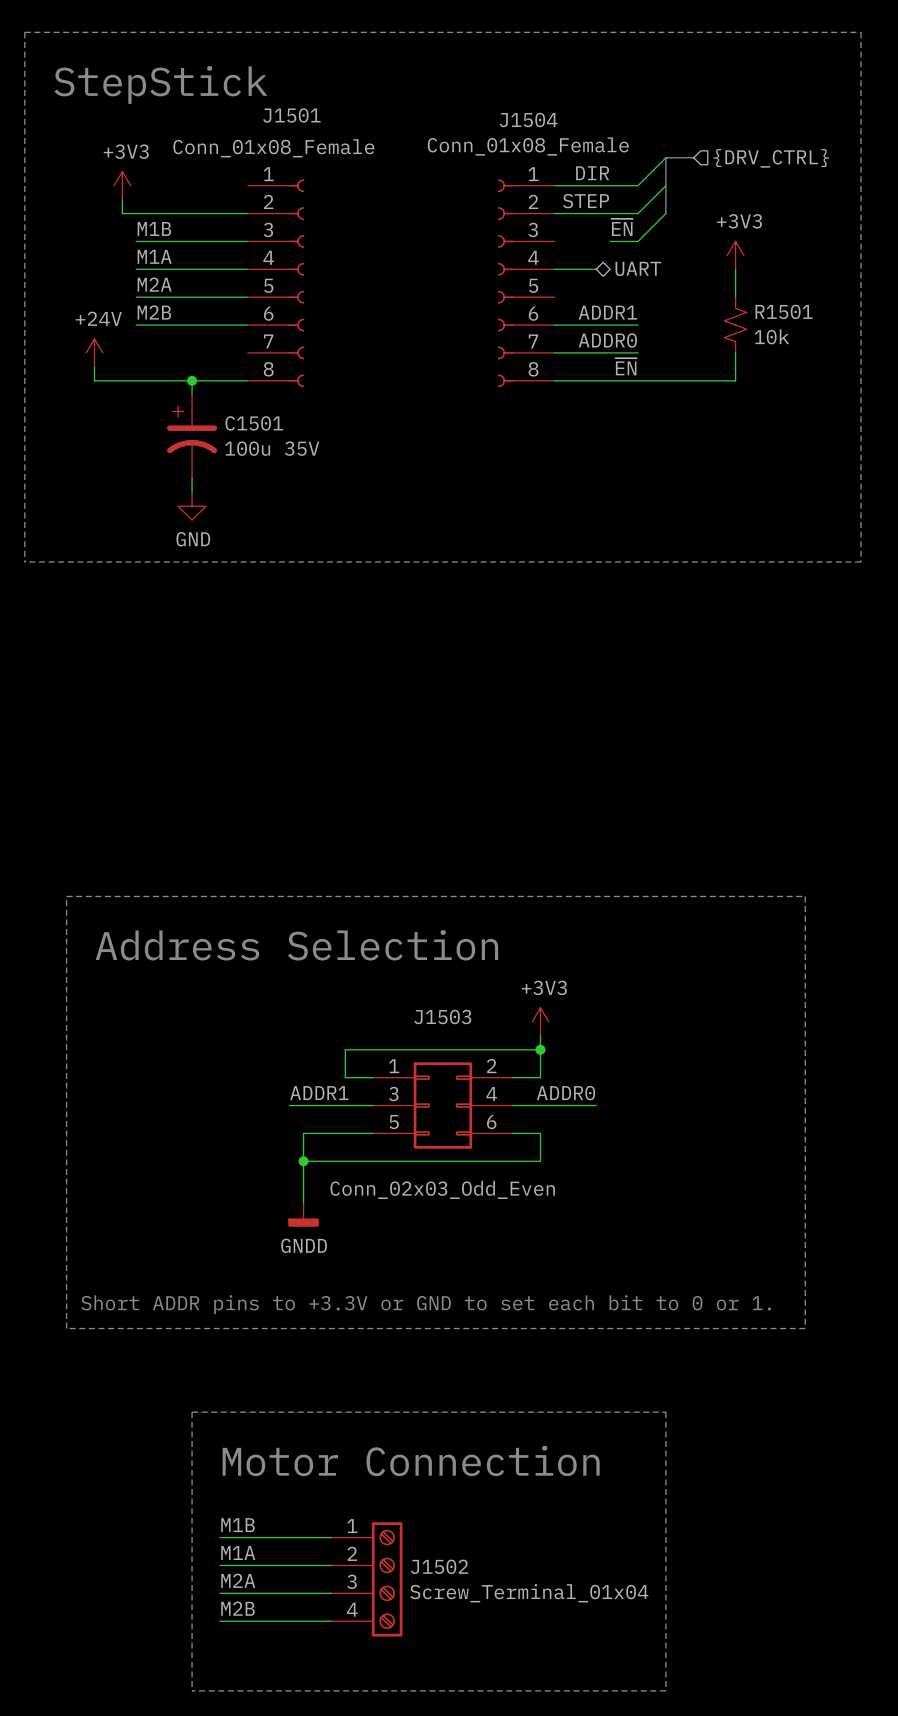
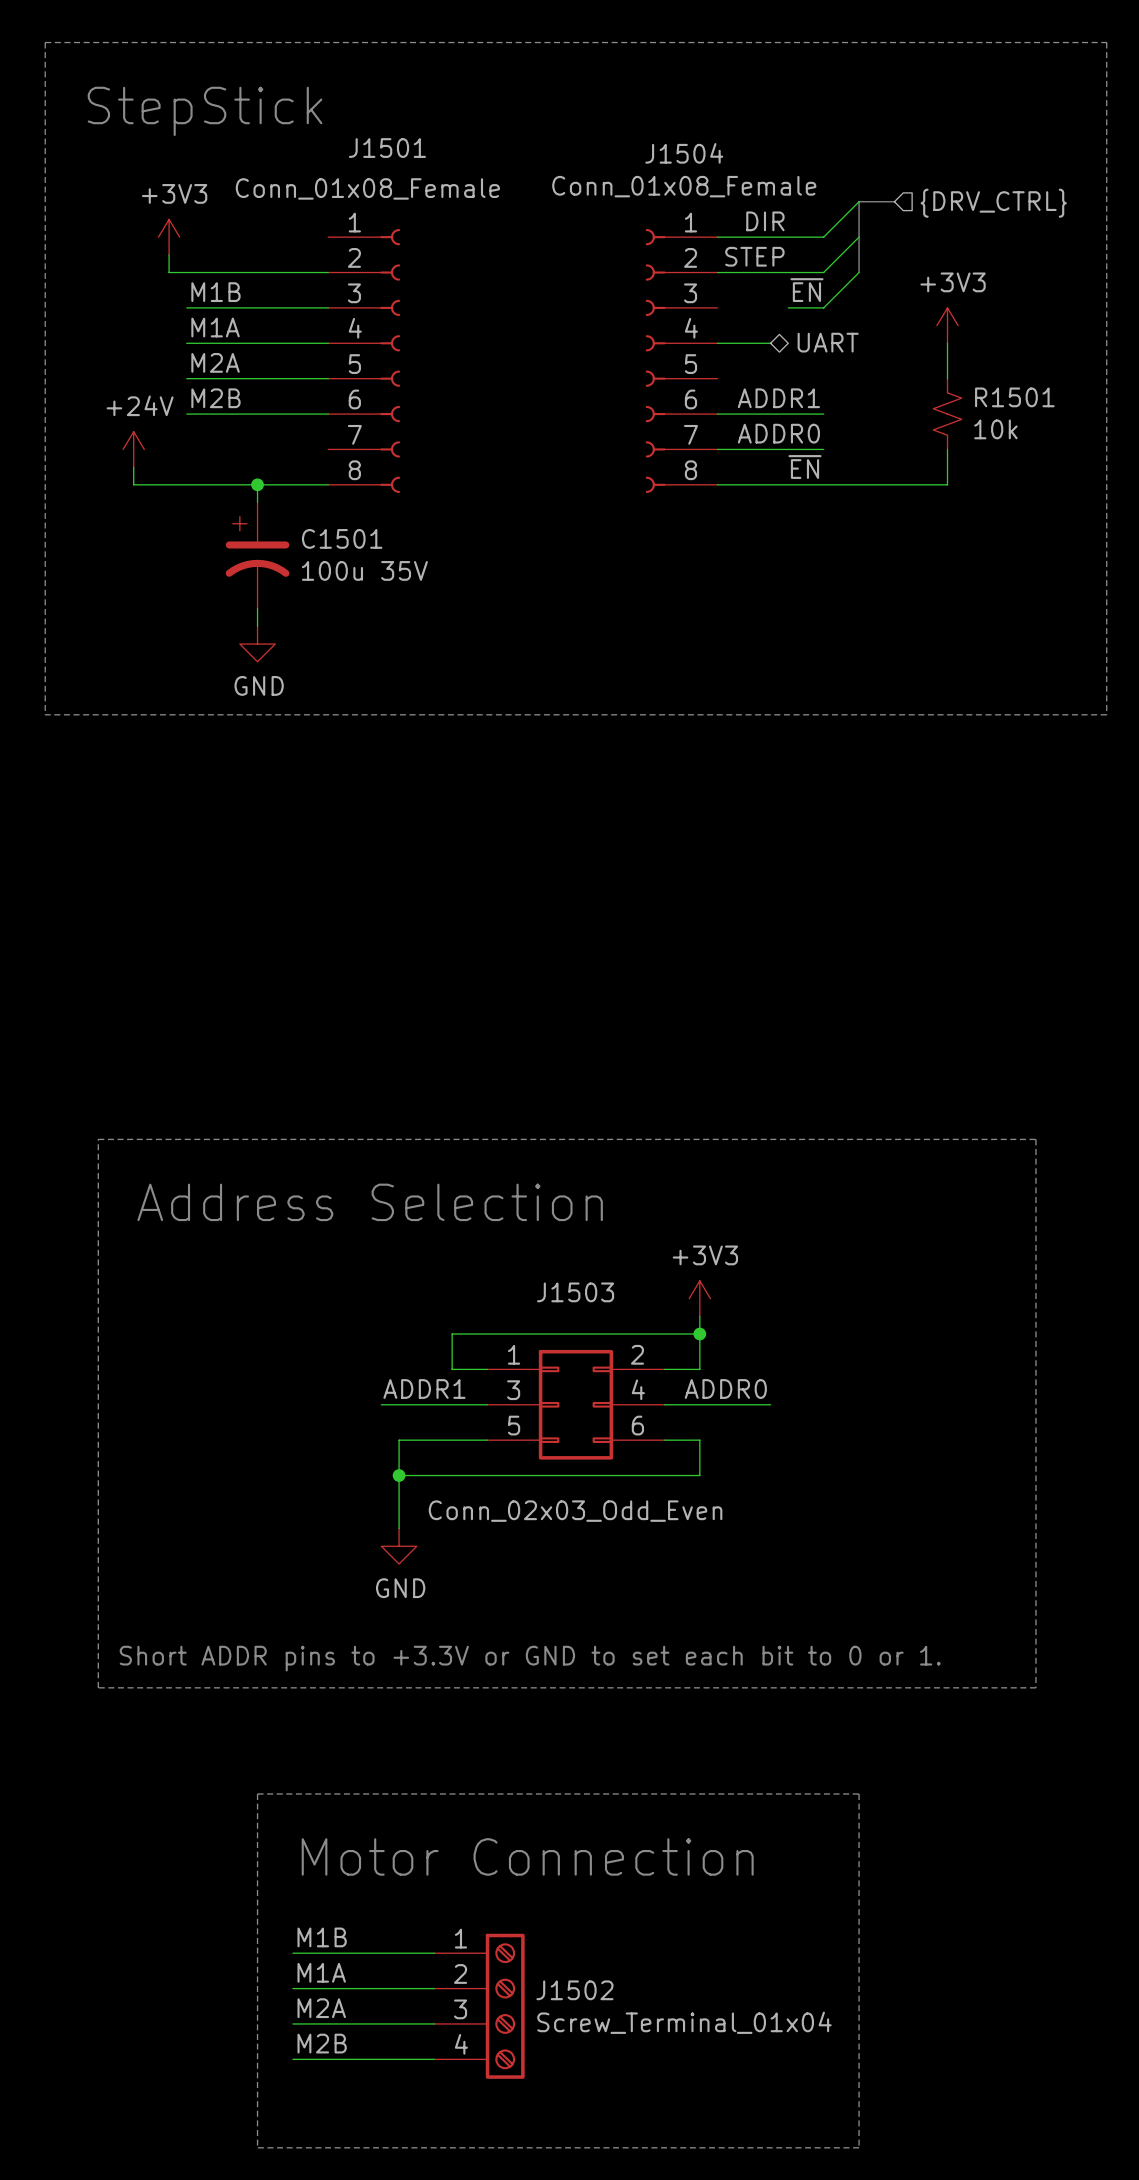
power symbol: GNDD (303, 1214) -> GND (399, 1546)

